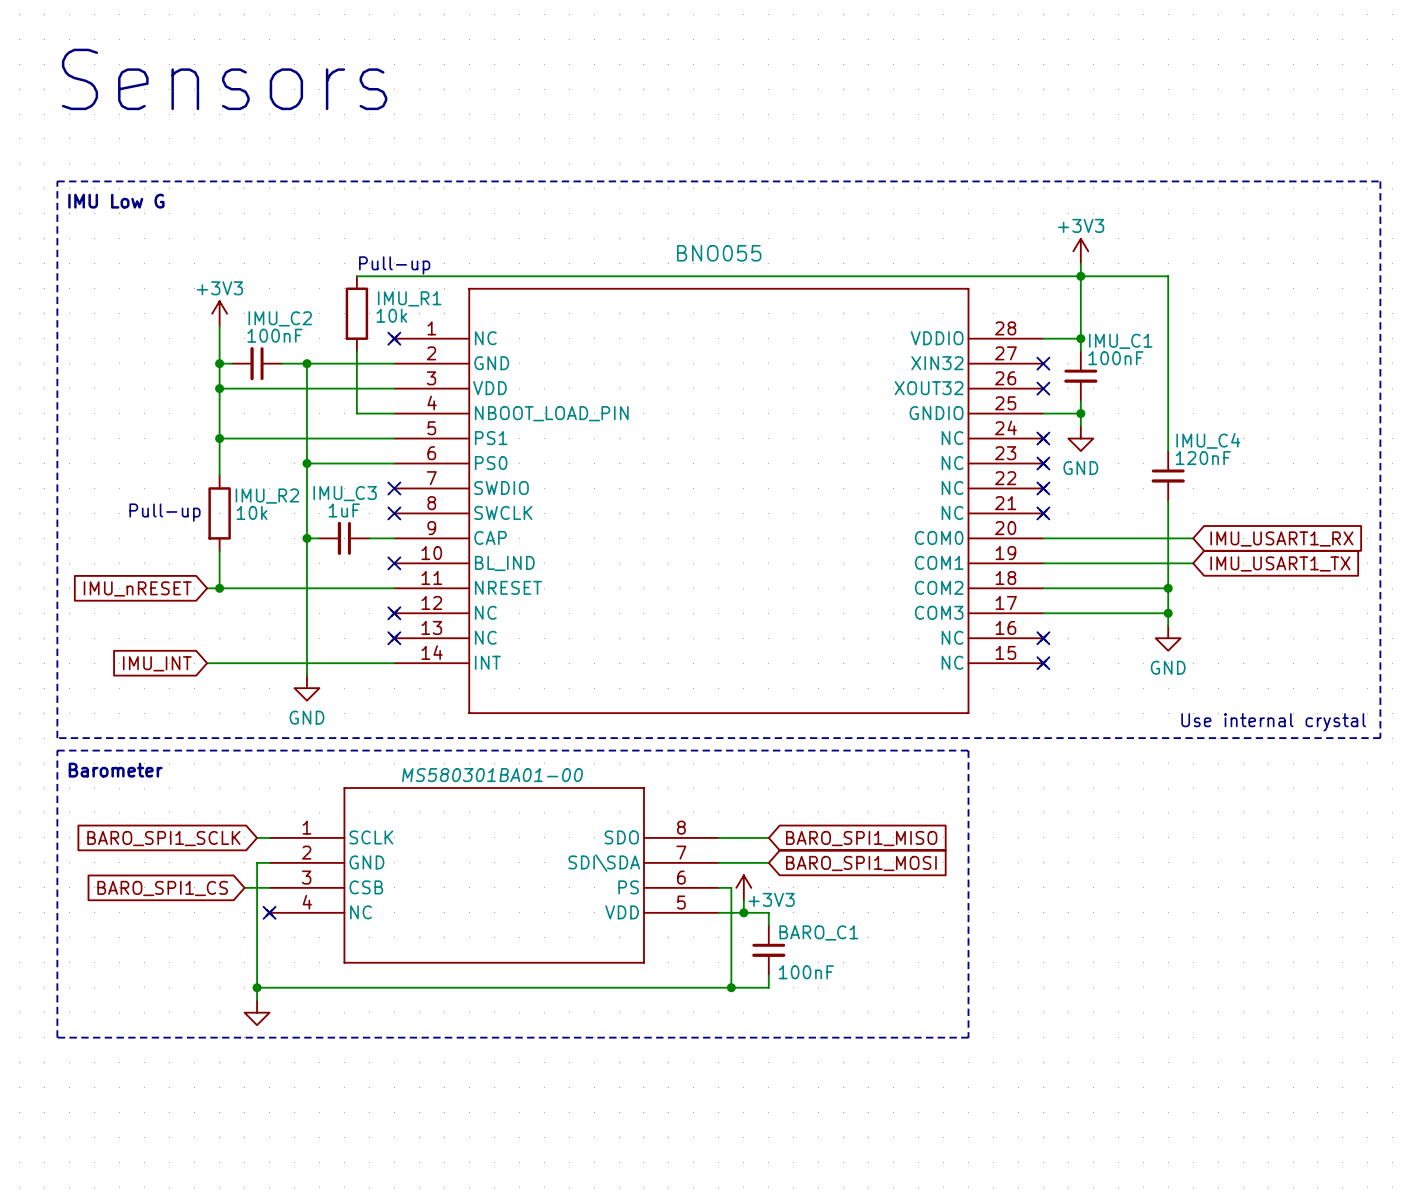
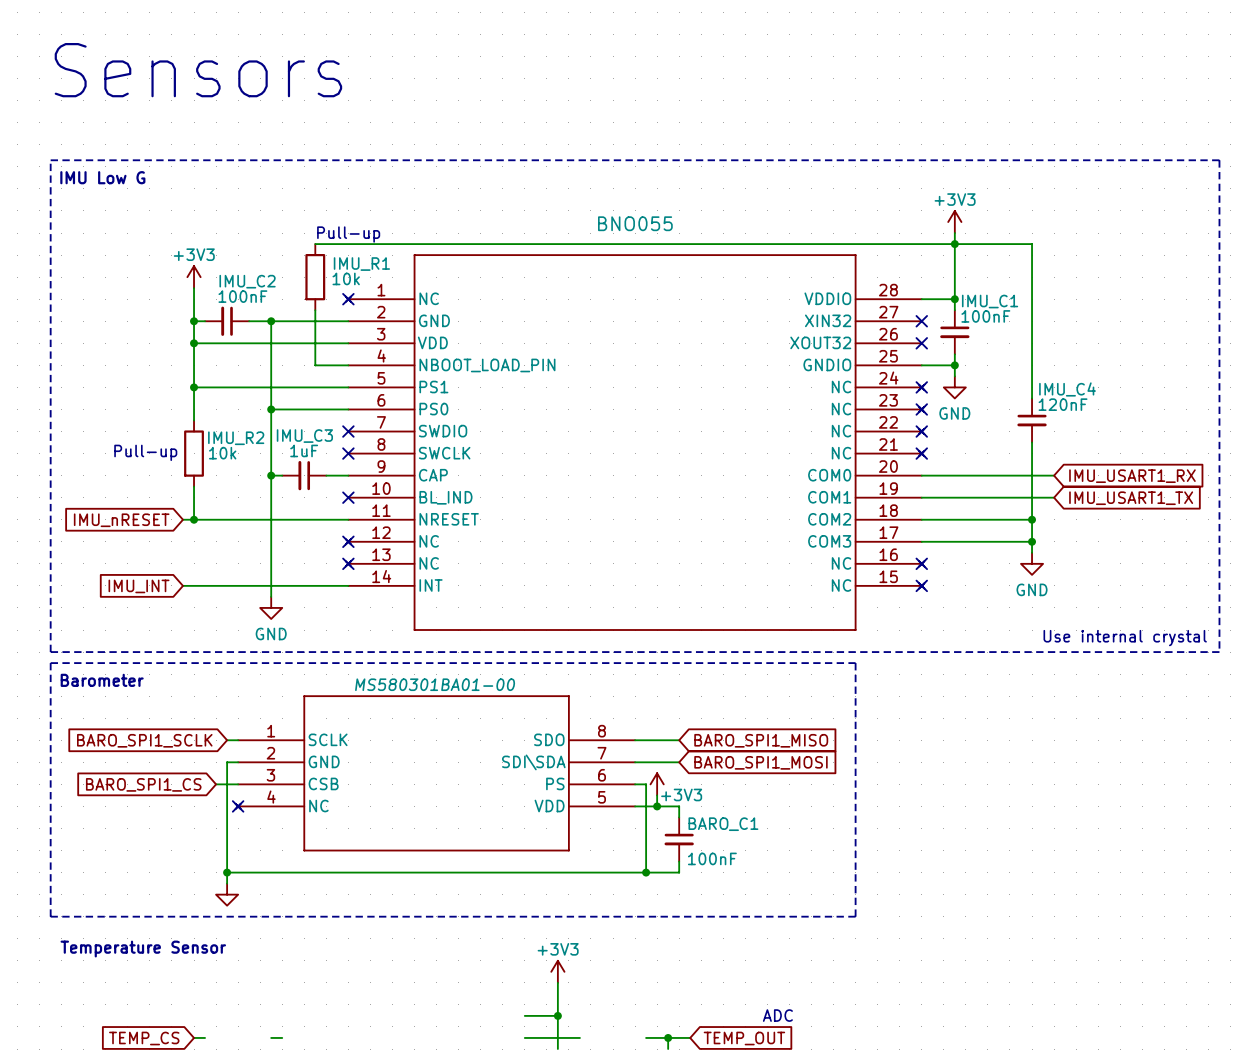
text: none -> Temperature Sensor (143, 949)
power symbol: none -> +3V3 (557, 971)
wire: none -> (557, 982) (557, 1049)
wire: none -> (524, 1015) (557, 1015)
junction: none -> (557, 1015)
text: none -> ADC (777, 1015)
wire: none -> (194, 1037) (205, 1037)
wire: none -> (271, 1037) (282, 1037)
wire: none -> (524, 1037) (579, 1037)
wire: none -> (646, 1037) (690, 1037)
wire: none -> (668, 1037) (668, 1049)
junction: none -> (668, 1037)
global label: none -> TEMP_CS (144, 1038)
global label: none -> TEMP_OUT (744, 1038)

